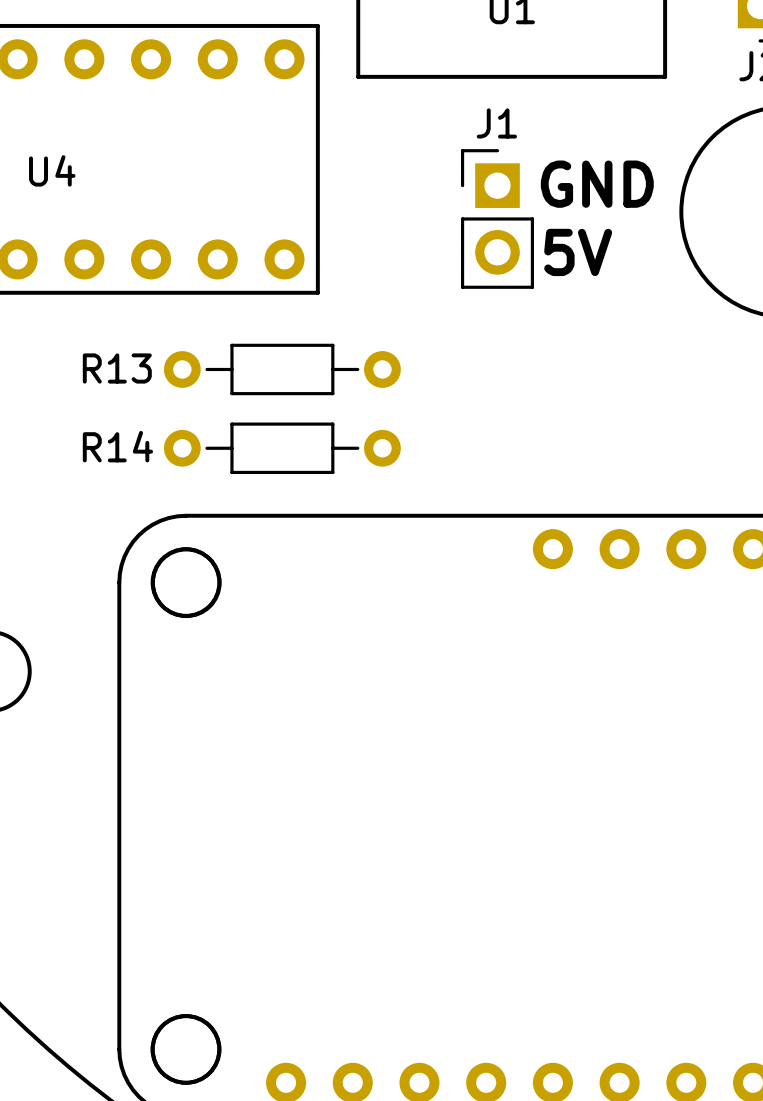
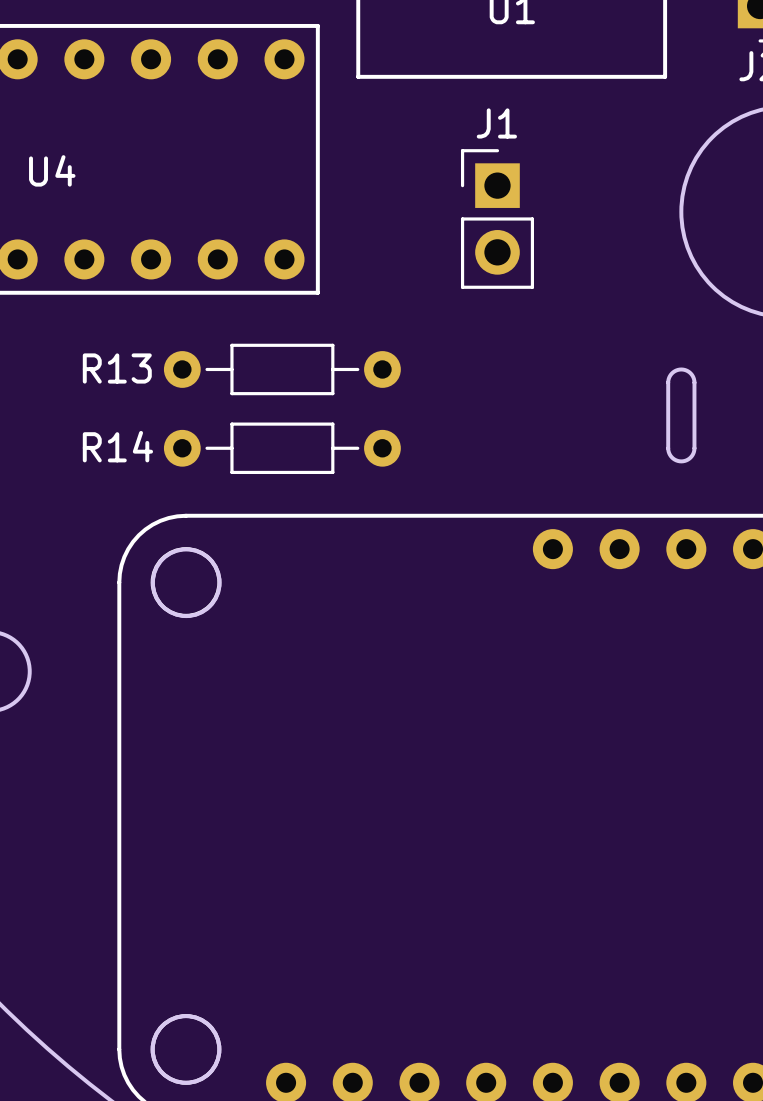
text: GND (597, 184) -> none
text: 5V (578, 252) -> none
board edge: none -> (668, 382) (668, 451) (674, 459) (684, 460) (690, 457) (694, 449) (694, 379) (689, 372) (679, 369) (672, 373) (668, 382)

